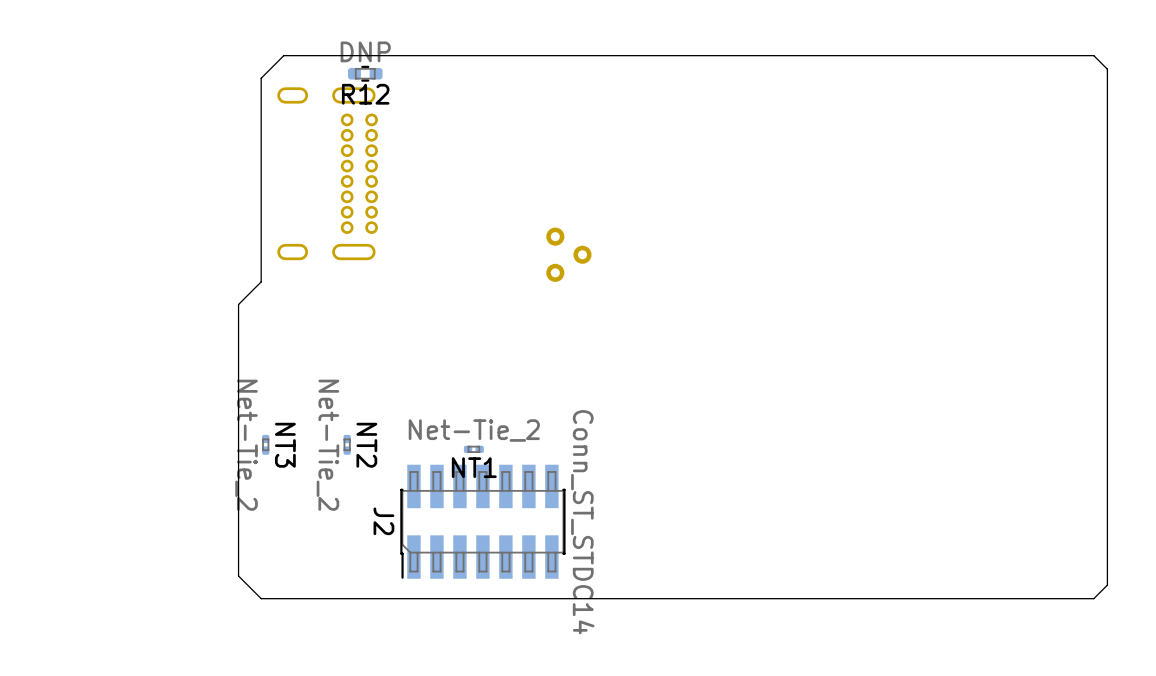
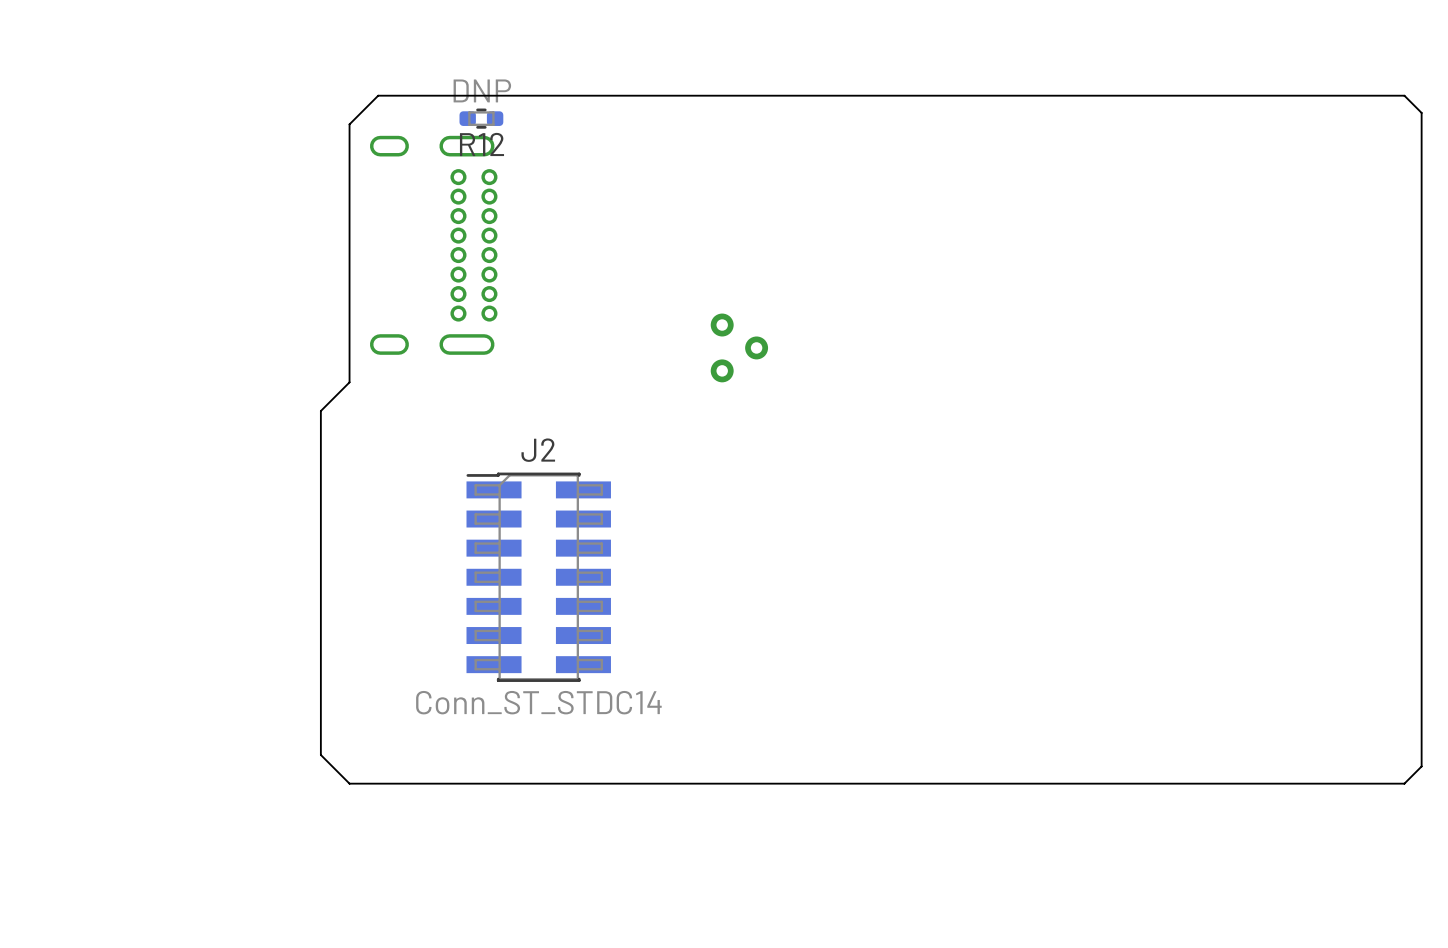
NT3: Net-Tie_2 (265, 444) -> none
NT2: Net-Tie_2 (347, 444) -> none
NT1: Net-Tie_2 (473, 449) -> none
J2 rotation: 0° (482, 521) -> 90° clockwise (538, 577)
J2 position: (482, 521) -> (538, 577)

